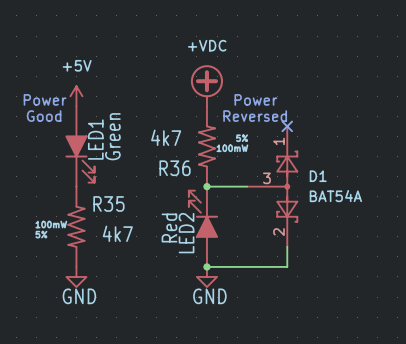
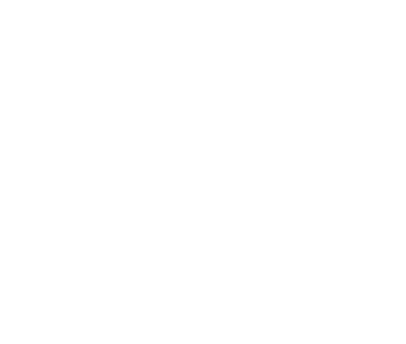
power symbol: +VDC (206, 85) -> none
power symbol: +5V (76, 96) -> none
text: Power (45, 99) -> none
text: Power (255, 99) -> none
text: Good (44, 116) -> none
text: Reversed (255, 116) -> none
no-connect mark: (287, 126) -> none
LED1: Green (79, 146) -> none
R36: 4k7 (206, 146) -> none
wire: (206, 186) (247, 186) -> none
junction: (206, 186) -> none
D1: BAT54A (272, 186) -> none
R35: 4k7 (76, 226) -> none
LED2: Red (203, 226) -> none
wire: (287, 246) (287, 266) (206, 266) -> none
junction: (206, 266) -> none
power symbol: GND (76, 276) -> none
power symbol: GND (206, 276) -> none

